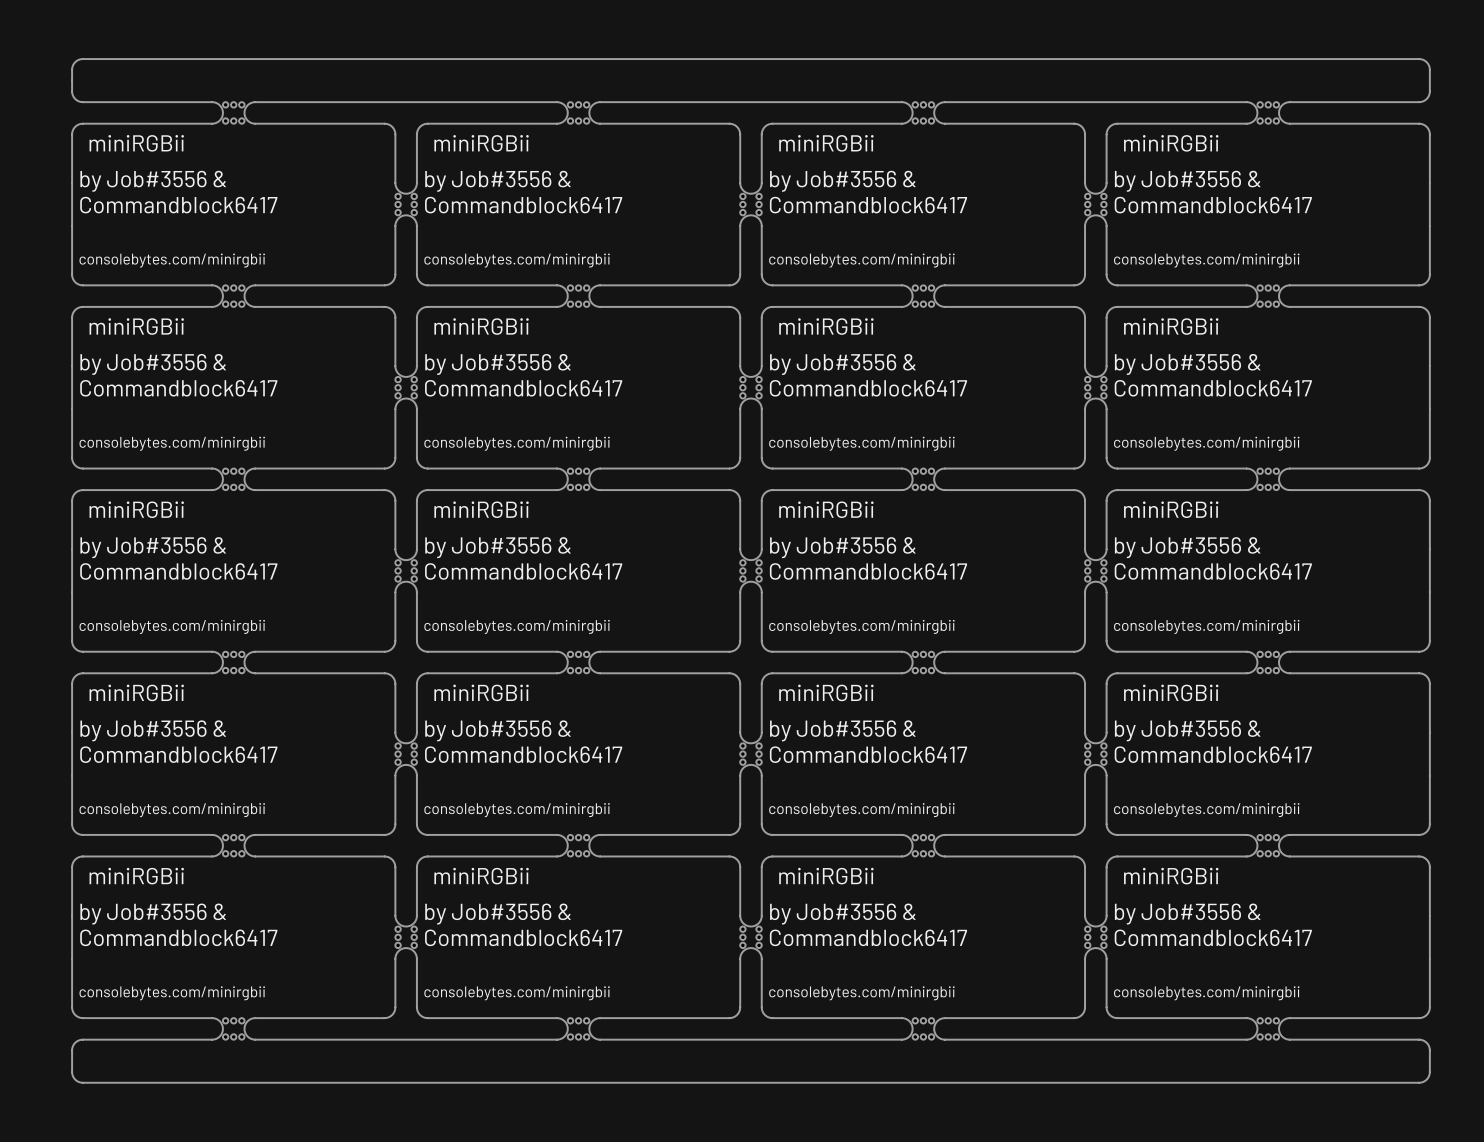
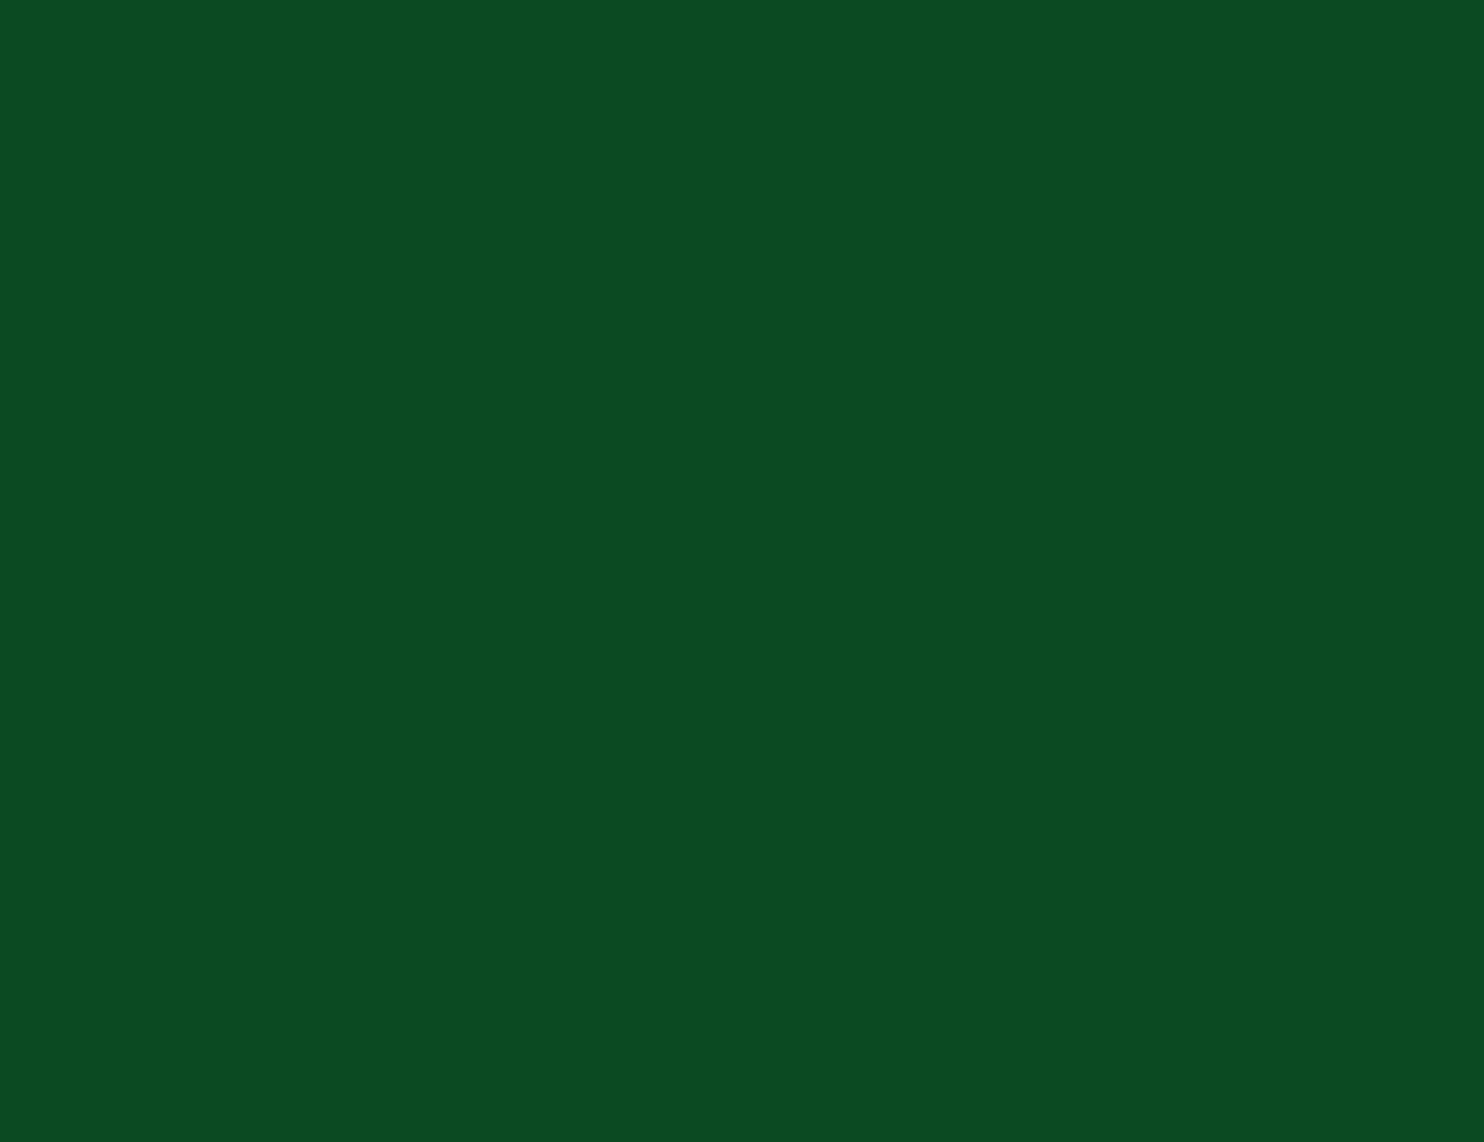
board edge: (1419, 59) (82, 59) (76, 61) (72, 68) (72, 91) (74, 97) (78, 101) (213, 102) (220, 106) (222, 112) (220, 119) (213, 123) (82, 123) (75, 126) (72, 134) (73, 279) (82, 285) (213, 285) (220, 289) (222, 296) (220, 302) (213, 306) (82, 306) (75, 310) (72, 317) (72, 461) (77, 467) (82, 468) (213, 468) (220, 472) (222, 479) (220, 485) (213, 490) (82, 490) (75, 493) (72, 500) (72, 643) (76, 649) (82, 651) (213, 651) (220, 655) (222, 662) (220, 669) (213, 673) (82, 673) (75, 676) (72, 684) (72, 825) (75, 831) (81, 834) (213, 835) (220, 839) (222, 845) (220, 852) (213, 856) (82, 856) (75, 859) (72, 867) (72, 1008) (75, 1014) (81, 1018) (213, 1018) (220, 1022) (222, 1028) (220, 1035) (213, 1039) (80, 1040) (74, 1043) (72, 1049) (72, 1073) (74, 1078) (82, 1082) (1419, 1082) (1425, 1080) (1429, 1073) (1429, 1050) (1427, 1043) (1423, 1040) (1288, 1039) (1282, 1036) (1279, 1028) (1282, 1021) (1288, 1018) (1420, 1018) (1426, 1014) (1429, 1008) (1429, 867) (1426, 859) (1419, 856) (1288, 856) (1282, 853) (1279, 845) (1282, 838) (1288, 835) (1420, 834) (1426, 831) (1429, 825) (1429, 684) (1426, 676) (1419, 673) (1288, 673) (1282, 670) (1279, 662) (1282, 654) (1288, 651) (1419, 651) (1425, 649) (1429, 643) (1429, 500) (1426, 493) (1419, 490) (1288, 490) (1281, 485) (1279, 479) (1281, 472) (1288, 468) (1419, 468) (1425, 466) (1429, 460) (1429, 317) (1426, 310) (1419, 306) (1288, 306) (1281, 302) (1279, 296) (1281, 289) (1288, 285) (1419, 285) (1428, 279) (1429, 134) (1426, 126) (1419, 123) (1288, 123) (1282, 120) (1279, 112) (1282, 105) (1288, 102) (1423, 101) (1429, 94) (1429, 68) (1425, 61) (1419, 59) -> none
board edge: (557, 102) (255, 102) (247, 105) (244, 112) (246, 119) (253, 123) (389, 125) (395, 133) (395, 185) (399, 191) (406, 193) (412, 191) (416, 185) (417, 133) (422, 125) (558, 123) (564, 120) (567, 112) (564, 105) (557, 102) -> none
board edge: (901, 102) (600, 102) (592, 105) (589, 112) (592, 120) (598, 123) (734, 125) (740, 133) (740, 185) (744, 191) (750, 193) (757, 191) (761, 185) (761, 133) (767, 125) (903, 123) (909, 120) (912, 112) (909, 105) (901, 102) -> none
board edge: (1246, 102) (944, 102) (937, 105) (934, 112) (937, 120) (943, 123) (1079, 125) (1084, 133) (1085, 185) (1089, 191) (1095, 193) (1102, 191) (1106, 185) (1106, 133) (1111, 125) (1248, 123) (1254, 120) (1257, 112) (1254, 105) (1246, 102) -> none
part: (233, 112) -> none
part: (578, 112) -> none
part: (923, 112) -> none
part: (1268, 112) -> none
text: miniRGBii (136, 143) -> none
text: miniRGBii (481, 143) -> none
text: miniRGBii (826, 143) -> none
text: miniRGBii (1171, 143) -> none
text: by Job#3556 & (153, 181) -> none
text: by Job#3556 & (498, 181) -> none
text: by Job#3556 & (842, 181) -> none
text: by Job#3556 & (1187, 181) -> none
part: (406, 204) -> none
part: (750, 204) -> none
part: (1095, 204) -> none
text: Commandblock6417 (178, 205) -> none
text: Commandblock6417 (523, 205) -> none
text: Commandblock6417 (868, 205) -> none
text: Commandblock6417 (1213, 205) -> none
board edge: (416, 226) (417, 275) (422, 283) (558, 285) (566, 292) (566, 301) (557, 306) (423, 307) (417, 316) (416, 368) (412, 374) (406, 376) (399, 374) (395, 368) (395, 316) (388, 307) (255, 306) (249, 305) (245, 300) (245, 290) (253, 285) (388, 284) (395, 275) (396, 221) (400, 216) (408, 215) (414, 219) (416, 226) -> none
board edge: (761, 226) (761, 275) (767, 283) (903, 285) (911, 292) (911, 301) (901, 306) (768, 307) (761, 316) (761, 368) (757, 374) (750, 376) (744, 374) (740, 368) (740, 316) (733, 307) (600, 306) (594, 305) (590, 300) (590, 290) (598, 285) (733, 284) (740, 275) (741, 221) (745, 216) (753, 215) (759, 219) (761, 226) -> none
board edge: (1106, 226) (1106, 275) (1111, 283) (1248, 285) (1256, 290) (1256, 301) (1246, 306) (1113, 307) (1106, 316) (1106, 368) (1102, 374) (1095, 376) (1089, 374) (1085, 368) (1084, 316) (1078, 307) (944, 306) (939, 305) (934, 300) (935, 290) (943, 285) (1078, 284) (1084, 275) (1085, 221) (1090, 216) (1098, 215) (1104, 219) (1106, 226) -> none
text: consolebytes.com/minirgbii (172, 260) -> none
text: consolebytes.com/minirgbii (517, 260) -> none
text: consolebytes.com/minirgbii (861, 260) -> none
text: consolebytes.com/minirgbii (1206, 260) -> none
part: (233, 296) -> none
part: (578, 296) -> none
part: (923, 296) -> none
part: (1268, 296) -> none
text: miniRGBii (136, 326) -> none
text: miniRGBii (481, 326) -> none
text: miniRGBii (826, 326) -> none
text: miniRGBii (1171, 326) -> none
text: by Job#3556 & (153, 364) -> none
text: by Job#3556 & (498, 364) -> none
text: by Job#3556 & (842, 364) -> none
text: by Job#3556 & (1187, 364) -> none
part: (406, 387) -> none
part: (750, 387) -> none
part: (1095, 387) -> none
text: Commandblock6417 (178, 388) -> none
text: Commandblock6417 (523, 388) -> none
text: Commandblock6417 (868, 388) -> none
text: Commandblock6417 (1213, 388) -> none
board edge: (416, 409) (417, 459) (422, 467) (558, 468) (566, 475) (566, 484) (557, 490) (423, 490) (417, 499) (416, 552) (412, 557) (406, 560) (399, 557) (395, 552) (395, 499) (388, 490) (255, 490) (249, 488) (245, 483) (245, 473) (253, 468) (388, 467) (395, 459) (396, 405) (400, 399) (408, 398) (414, 402) (416, 409) -> none
board edge: (761, 409) (761, 459) (767, 467) (903, 468) (911, 475) (911, 484) (901, 490) (768, 490) (761, 499) (761, 552) (757, 557) (750, 560) (744, 557) (740, 552) (740, 499) (733, 490) (600, 490) (594, 488) (590, 483) (590, 473) (598, 468) (733, 467) (740, 459) (741, 405) (745, 399) (753, 398) (759, 402) (761, 409) -> none
board edge: (1106, 409) (1106, 459) (1111, 467) (1248, 468) (1256, 473) (1256, 484) (1246, 490) (1113, 490) (1106, 499) (1106, 552) (1102, 557) (1095, 560) (1089, 557) (1085, 552) (1084, 499) (1078, 490) (944, 490) (939, 488) (934, 483) (935, 473) (943, 468) (1078, 467) (1084, 459) (1085, 405) (1090, 399) (1098, 398) (1104, 402) (1106, 409) -> none
text: consolebytes.com/minirgbii (172, 443) -> none
text: consolebytes.com/minirgbii (517, 443) -> none
text: consolebytes.com/minirgbii (861, 443) -> none
text: consolebytes.com/minirgbii (1206, 443) -> none
part: (233, 479) -> none
part: (578, 479) -> none
part: (923, 479) -> none
part: (1268, 479) -> none
text: miniRGBii (136, 509) -> none
text: miniRGBii (481, 509) -> none
text: miniRGBii (826, 509) -> none
text: miniRGBii (1171, 509) -> none
text: by Job#3556 & (153, 547) -> none
text: by Job#3556 & (498, 547) -> none
text: by Job#3556 & (842, 547) -> none
text: by Job#3556 & (1187, 547) -> none
part: (406, 570) -> none
part: (750, 570) -> none
part: (1095, 570) -> none
text: Commandblock6417 (178, 571) -> none
text: Commandblock6417 (523, 571) -> none
text: Commandblock6417 (868, 571) -> none
text: Commandblock6417 (1213, 571) -> none
board edge: (416, 592) (417, 642) (422, 650) (558, 651) (566, 658) (566, 667) (557, 673) (423, 674) (417, 682) (416, 735) (412, 741) (406, 743) (399, 741) (395, 735) (395, 682) (388, 674) (255, 673) (248, 671) (245, 666) (245, 657) (253, 651) (388, 650) (395, 642) (396, 588) (402, 582) (408, 582) (414, 585) (416, 592) -> none
board edge: (761, 592) (761, 642) (767, 650) (903, 651) (911, 658) (911, 667) (901, 673) (768, 674) (761, 682) (761, 735) (757, 741) (750, 743) (744, 741) (740, 735) (740, 682) (733, 674) (600, 673) (593, 671) (590, 666) (590, 657) (598, 651) (733, 650) (740, 642) (741, 588) (746, 582) (753, 582) (759, 585) (761, 592) -> none
board edge: (1106, 592) (1106, 642) (1111, 650) (1248, 651) (1256, 657) (1256, 667) (1246, 673) (1113, 674) (1106, 682) (1106, 735) (1102, 741) (1095, 743) (1089, 741) (1085, 735) (1084, 682) (1078, 674) (944, 673) (938, 671) (934, 666) (935, 657) (943, 651) (1078, 650) (1084, 642) (1085, 588) (1090, 583) (1097, 581) (1103, 584) (1106, 592) -> none
text: consolebytes.com/minirgbii (172, 626) -> none
text: consolebytes.com/minirgbii (517, 626) -> none
text: consolebytes.com/minirgbii (861, 626) -> none
text: consolebytes.com/minirgbii (1206, 626) -> none
part: (233, 662) -> none
part: (578, 662) -> none
part: (923, 662) -> none
part: (1268, 662) -> none
text: miniRGBii (136, 692) -> none
text: miniRGBii (481, 692) -> none
text: miniRGBii (826, 692) -> none
text: miniRGBii (1171, 692) -> none
text: by Job#3556 & (153, 730) -> none
text: by Job#3556 & (498, 730) -> none
text: by Job#3556 & (842, 730) -> none
text: by Job#3556 & (1187, 730) -> none
text: Commandblock6417 (178, 754) -> none
part: (406, 754) -> none
text: Commandblock6417 (523, 754) -> none
part: (750, 754) -> none
text: Commandblock6417 (868, 754) -> none
part: (1095, 754) -> none
text: Commandblock6417 (1213, 754) -> none
board edge: (416, 775) (417, 825) (422, 833) (558, 835) (566, 841) (566, 851) (557, 856) (423, 857) (417, 865) (416, 918) (412, 924) (406, 926) (399, 924) (395, 918) (395, 865) (388, 857) (255, 856) (248, 854) (245, 849) (245, 840) (253, 835) (388, 834) (395, 825) (396, 771) (402, 765) (408, 765) (414, 769) (416, 775) -> none
board edge: (761, 775) (761, 825) (767, 833) (903, 835) (911, 841) (911, 851) (901, 856) (768, 857) (761, 865) (761, 918) (757, 924) (750, 926) (744, 924) (740, 918) (740, 865) (733, 857) (600, 856) (593, 854) (590, 849) (590, 840) (598, 835) (733, 834) (740, 825) (741, 771) (746, 765) (753, 765) (759, 769) (761, 775) -> none
board edge: (1106, 775) (1106, 825) (1111, 833) (1248, 835) (1256, 840) (1256, 851) (1246, 856) (1113, 857) (1106, 865) (1106, 918) (1102, 924) (1095, 926) (1089, 924) (1085, 918) (1084, 865) (1078, 857) (944, 856) (938, 854) (934, 849) (935, 840) (943, 835) (1078, 834) (1084, 825) (1085, 771) (1090, 766) (1097, 764) (1103, 768) (1106, 775) -> none
text: consolebytes.com/minirgbii (172, 810) -> none
text: consolebytes.com/minirgbii (517, 810) -> none
text: consolebytes.com/minirgbii (861, 810) -> none
text: consolebytes.com/minirgbii (1206, 810) -> none
part: (233, 845) -> none
part: (578, 845) -> none
part: (923, 845) -> none
part: (1268, 845) -> none
text: miniRGBii (136, 876) -> none
text: miniRGBii (481, 876) -> none
text: miniRGBii (826, 876) -> none
text: miniRGBii (1171, 876) -> none
text: by Job#3556 & (153, 914) -> none
text: by Job#3556 & (498, 914) -> none
text: by Job#3556 & (842, 914) -> none
text: by Job#3556 & (1187, 914) -> none
text: Commandblock6417 (178, 937) -> none
part: (406, 937) -> none
text: Commandblock6417 (523, 937) -> none
part: (750, 937) -> none
text: Commandblock6417 (868, 937) -> none
part: (1095, 937) -> none
text: Commandblock6417 (1213, 937) -> none
board edge: (416, 958) (417, 1008) (422, 1016) (558, 1018) (566, 1024) (566, 1034) (557, 1039) (255, 1039) (248, 1037) (245, 1033) (245, 1023) (253, 1018) (388, 1017) (395, 1008) (396, 954) (402, 948) (408, 948) (414, 952) (416, 958) -> none
board edge: (761, 958) (761, 1008) (767, 1016) (903, 1018) (911, 1024) (911, 1034) (901, 1039) (600, 1039) (593, 1037) (590, 1033) (590, 1023) (598, 1018) (733, 1017) (740, 1008) (741, 954) (746, 948) (753, 948) (759, 952) (761, 958) -> none
board edge: (1106, 958) (1106, 1008) (1111, 1016) (1248, 1018) (1256, 1023) (1256, 1034) (1246, 1039) (944, 1039) (938, 1037) (934, 1033) (935, 1023) (943, 1018) (1078, 1017) (1084, 1008) (1085, 954) (1090, 949) (1097, 948) (1103, 951) (1106, 958) -> none
text: consolebytes.com/minirgbii (172, 993) -> none
text: consolebytes.com/minirgbii (517, 993) -> none
text: consolebytes.com/minirgbii (861, 993) -> none
text: consolebytes.com/minirgbii (1206, 993) -> none
part: (233, 1028) -> none
part: (578, 1028) -> none
part: (923, 1028) -> none
part: (1268, 1028) -> none

